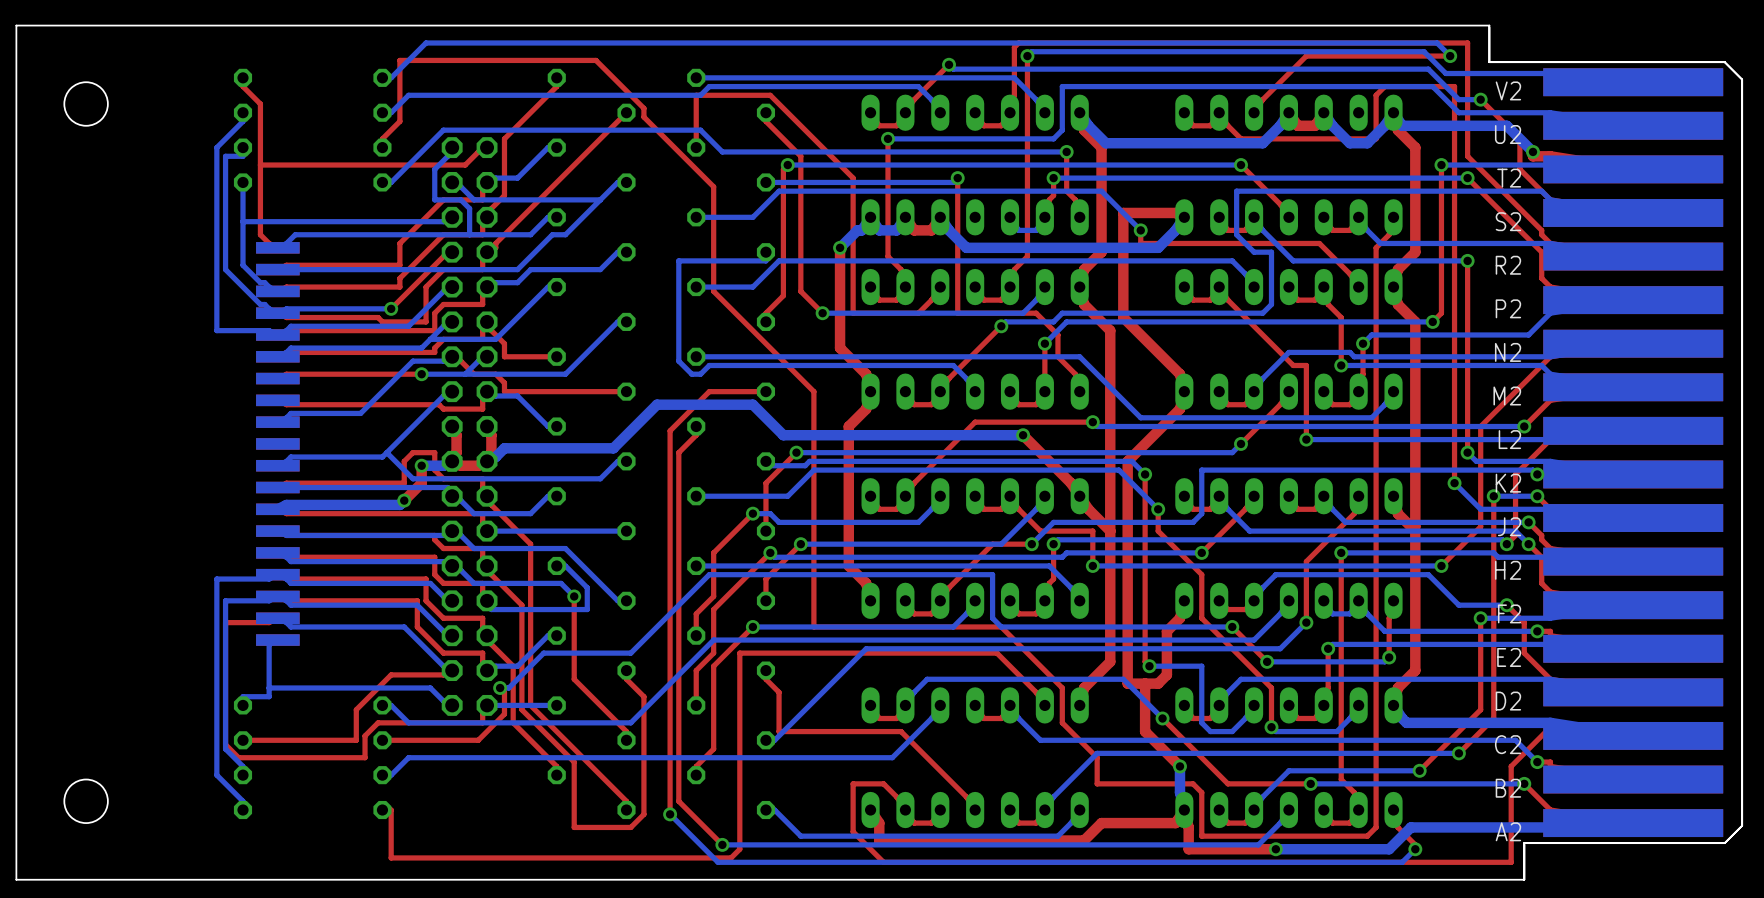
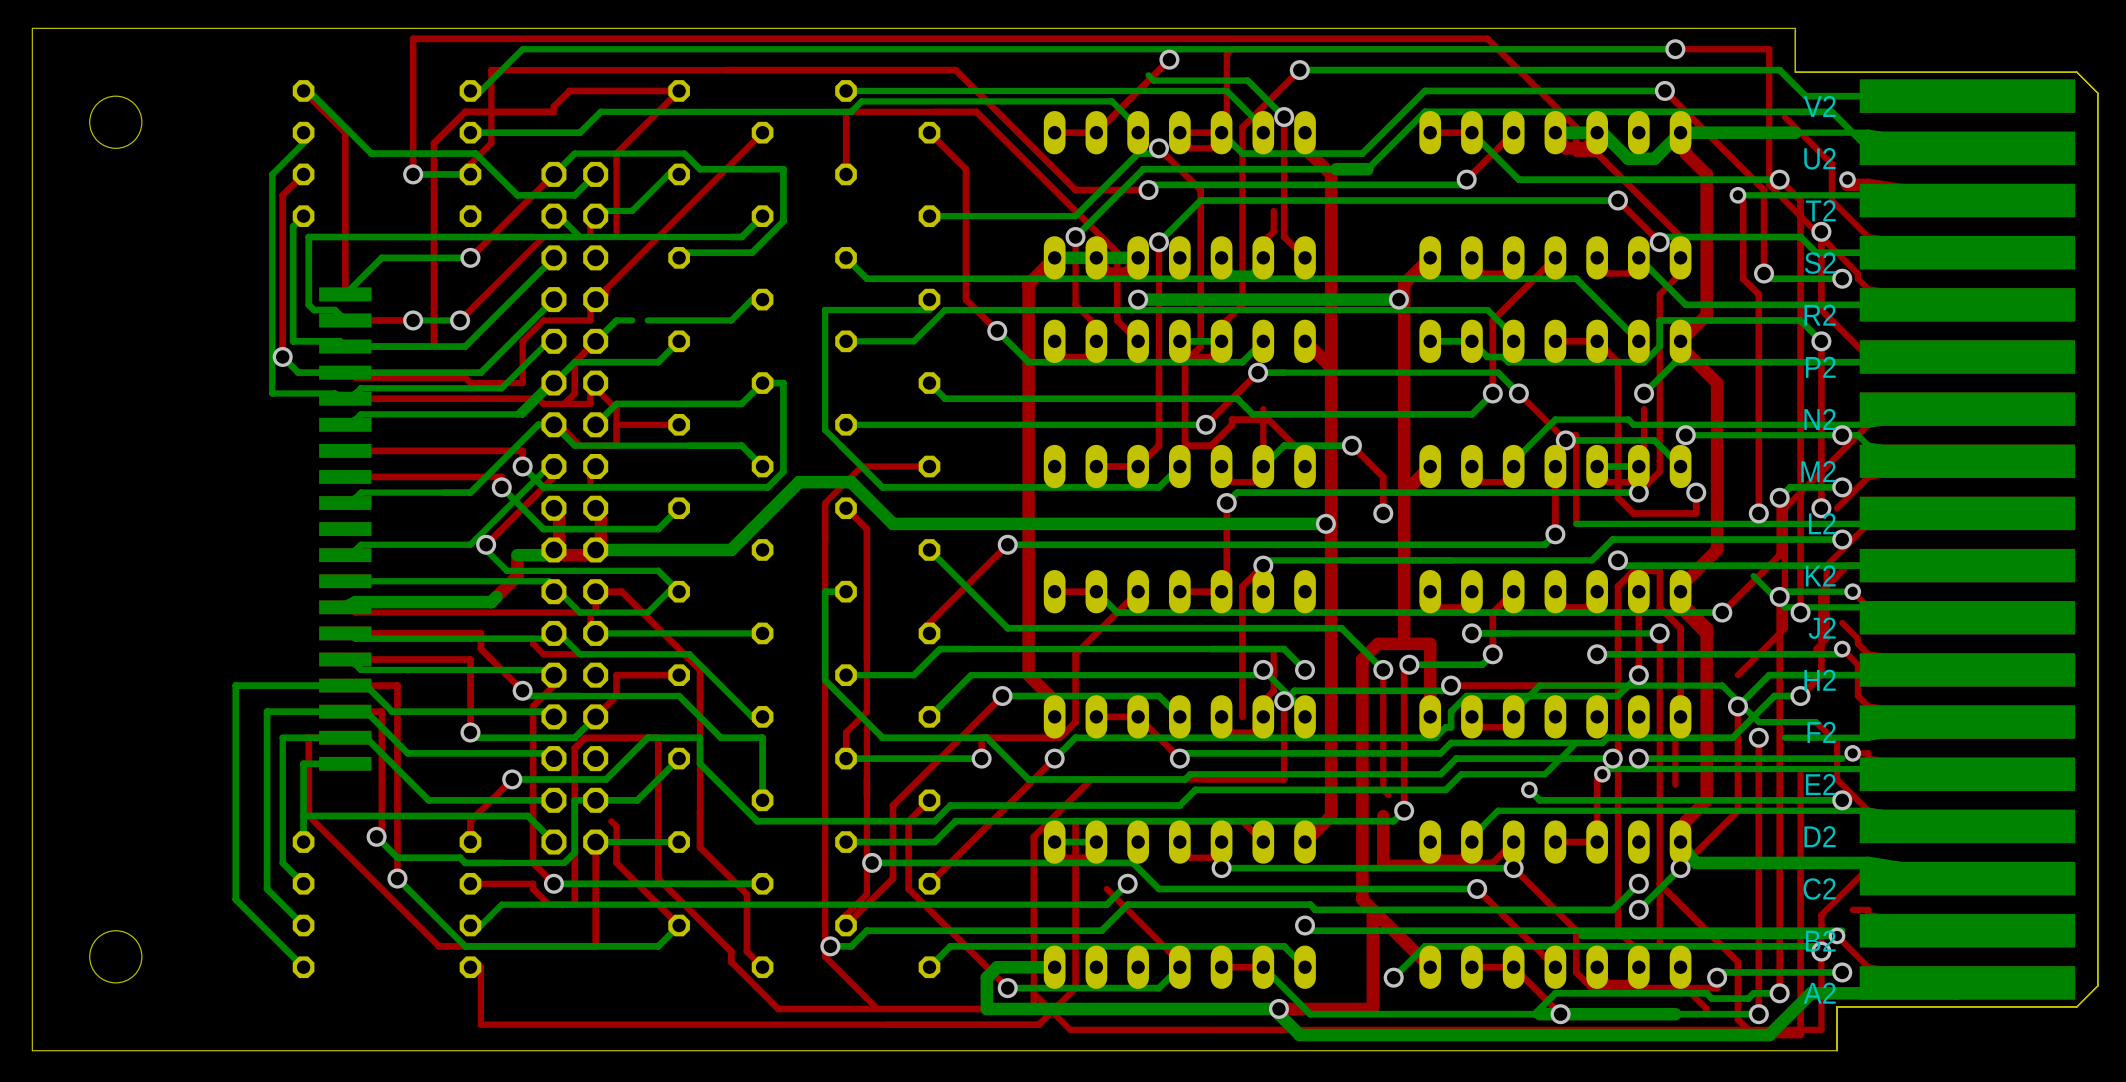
bottom track: (1389, 42) (1437, 42) (1450, 56) -> none
via: none -> (1675, 49)
via: none -> (1169, 59)
top track: (1027, 56) (1027, 108) -> (1299, 70) (1242, 127)
bottom track: (1027, 56) (1031, 51) (1424, 51) (1445, 73) (1550, 73) (1633, 82) -> (1299, 70) (1779, 70) (1805, 96) (1967, 96)
via: (1027, 56) -> none
top track: (1450, 56) (1306, 56) (1262, 99) (1254, 112) -> (1466, 179) (1513, 132)
via: (1450, 56) -> none
top track: (596, 60) (643, 108) (643, 117) (713, 186) (713, 291) (813, 391) (813, 626) (1001, 626) (1062, 687) (1062, 722) (1097, 757) (1097, 783) (1193, 783) (1201, 792) (1201, 836) (1367, 836) (1376, 827) (1376, 792) -> (726, 70) (955, 70) (1075, 190) (1148, 190)
via: none -> (1299, 70)
top track: (949, 64) (914, 99) (896, 125) (879, 125) (870, 112) -> (1169, 59) (1096, 132) (1054, 132)
via: (949, 64) -> none
bottom track: (1031, 69) (1428, 69) (1458, 99) (1480, 99) -> (1247, 80) (1284, 117)
top track: (243, 77) (243, 86) (260, 104) (260, 234) (269, 243) (277, 247) -> (303, 90) (345, 132) (345, 294)
bottom track: none -> (303, 90) (308, 90) (371, 153) (475, 153) (517, 195) (574, 195) (595, 174)
top track: (556, 77) (556, 86) (504, 138) -> none
top track: none -> (1664, 90) (1764, 190) (1764, 273)
bottom track: none -> (1664, 90) (1424, 90) (1362, 153) (1242, 153) (1221, 132)
via: none -> (1664, 90)
bottom track: (491, 95) (408, 95) (391, 112) -> (600, 111) (580, 132) (480, 132)
top track: (770, 95) (853, 178) (853, 313) (918, 313) (931, 300) (940, 287) -> (934, 111) (976, 111) (1117, 252) (1117, 320) (1138, 341)
via: none -> (1284, 117)
via: (1480, 99) -> none
top track: (765, 112) (765, 121) (800, 156) (800, 291) (822, 313) -> (929, 132) (965, 169) (965, 299) (997, 330)
top track: none -> (1221, 132) (1179, 132)
bottom track: (1079, 112) (1088, 125) (1105, 143) -> (1075, 237) (1143, 169) (1336, 169)
top track: (1184, 112) (1193, 125) (1210, 125) (1219, 112) (1227, 125) (1241, 138) (1376, 138) (1376, 95) (1384, 86) (1454, 86) (1454, 483) -> (1430, 132) (1471, 132)
bottom track: none -> (1471, 132) (1518, 179) (1779, 179)
bottom track: (1288, 112) (1280, 125) (1262, 143) (1132, 143) -> (1555, 132) (1602, 132) (1628, 158) (1654, 158) (1680, 132) (1758, 132)
bottom track: (1323, 112) (1332, 125) (1349, 143) (1367, 143) (1384, 125) (1393, 112) (1402, 125) (1506, 125) (1532, 151) -> none
bottom track: (1458, 112) (1432, 86) (1062, 86) (1062, 130) (1053, 138) (887, 138) -> none
bottom track width: thin (1489, 112) (1458, 112) -> thick (1795, 132) (1758, 132)
via: none -> (1158, 148)
bottom track: none -> (1967, 148) (1868, 148) (1831, 111) (1424, 111) (1367, 169)
bottom track: (469, 130) (443, 130) (391, 182) (382, 182) -> (574, 153) (553, 174)
bottom track: (561, 130) (700, 130) (722, 151) (1066, 151) -> (684, 153) (699, 169) (783, 169) (783, 221) (752, 252) (684, 252) (679, 257)
top track: (887, 138) (887, 199) -> none
via: (887, 138) -> none
top track: none -> (303, 174) (282, 195) (282, 356)
bottom track: (243, 147) (243, 156) (225, 156) (225, 269) (260, 304) (264, 304) (277, 313) (286, 308) (391, 308) -> none
top track: none -> (413, 174) (413, 38) (1487, 38) (1576, 127) (1576, 153) (1597, 153) (1680, 237) (1680, 257)
via: none -> (413, 174)
top track: none -> (553, 174) (470, 257)
bottom track: (452, 147) (447, 156) (434, 169) (434, 199) -> none
top track: (487, 147) (478, 151) (465, 165) (260, 165) -> none
top track: (1066, 151) (1066, 191) (1075, 199) (1079, 217) -> (1284, 117) (1284, 237) (1305, 257)
via: (1066, 151) -> none
bottom track: none -> (1466, 179) (1461, 184) (1153, 184) (1148, 190)
via: none -> (1466, 179)
top track: none -> (1779, 179) (1800, 200) (1800, 591)
via: none -> (1779, 179)
via: none -> (1148, 190)
top track: (787, 165) (783, 169) (783, 295) (765, 313) (765, 321) -> none
via: (787, 165) -> none
top track: (1241, 165) (1280, 204) (1288, 217) -> (1492, 393) (1492, 320) (1555, 257)
bottom track: (1241, 165) (787, 165) -> none
via: (1241, 165) -> none
top track: (1441, 165) (1441, 313) (1432, 321) -> none
top track: none -> (1617, 200) (1659, 242)
bottom track: none -> (1617, 200) (1200, 200) (1158, 242)
via: none -> (1617, 200)
top track: none -> (1743, 200) (1743, 278) (1758, 294) (1758, 513)
top track: (957, 178) (957, 204) -> none
bottom track: (957, 178) (953, 182) (887, 182) -> (1158, 148) (1153, 153) (1138, 153) (1075, 216)
via: (957, 178) -> none
via: (1053, 178) -> none
top track: (1467, 178) (1541, 252) (1541, 278) (1550, 287) (1633, 300) -> (1821, 231) (1821, 310) (1868, 356) (1967, 356)
bottom track: (1467, 178) (1053, 178) -> none
via: (1467, 178) -> none
bottom track: (243, 182) (243, 265) (260, 282) (264, 282) (277, 291) -> none
bottom track: (626, 182) (617, 182) (565, 234) (552, 234) (517, 269) -> (762, 216) (741, 237) (731, 237)
top track: (504, 195) (491, 208) (482, 226) (482, 234) (443, 234) (399, 278) (399, 287) (286, 287) (277, 291) -> (616, 163) (616, 153) (679, 90) (569, 90) (553, 106) (553, 111) (465, 111) (433, 143) (433, 346) (345, 346)
via: none -> (1821, 231)
bottom track: (460, 199) (469, 208) (469, 234) -> (564, 237) (580, 237)
via: none -> (1075, 237)
via: none -> (1158, 242)
via: none -> (1659, 242)
bottom track: (1633, 212) (1550, 199) (1541, 191) (1236, 191) (1236, 234) (1254, 252) (1271, 252) (1271, 304) (1262, 313) (1241, 313) -> (1967, 252) (1816, 252) (1800, 237) (1664, 237) (1659, 242)
via: none -> (470, 257)
bottom track: (452, 217) (443, 221) (243, 221) -> (553, 257) (465, 346) (345, 346) (340, 341) (293, 341) (293, 226) (303, 216)
bottom track: (556, 217) (548, 217) (530, 234) (295, 234) (286, 243) (277, 247) -> (470, 257) (381, 257) (345, 294)
bottom track: (696, 217) (752, 217) (779, 191) (1101, 191) (1140, 230) -> (846, 257) (866, 278) (1576, 278) (1638, 341)
bottom track: (905, 217) (896, 230) (879, 230) (870, 217) (861, 230) (857, 230) (840, 247) -> none
top track: (1184, 217) (1175, 212) (1123, 212) (1123, 317) (1179, 374) (1184, 391) (1179, 409) (1127, 461) (1127, 552) -> (1430, 257) (1404, 283) (1404, 487) (1406, 489)
bottom track: (1184, 217) (1175, 230) (1158, 247) (966, 247) (949, 230) (940, 217) -> (1054, 257) (1138, 257)
bottom track: (1254, 217) (1262, 230) (1293, 260) (1467, 260) -> none
bottom track: (1358, 217) (1367, 230) (1380, 243) (1550, 243) (1633, 256) -> (1638, 257) (1685, 304) (1967, 304)
top track: (1140, 230) (1140, 243) (1319, 243) (1349, 273) (1358, 287) -> none
via: (1140, 230) -> none
bottom track: none -> (1764, 273) (1769, 278) (1842, 278)
via: none -> (1764, 273)
via: none -> (1842, 278)
top track: (399, 243) (399, 265) (286, 265) (277, 269) -> (413, 320) (345, 320)
top track: none -> (491, 289) (460, 320)
top track: (840, 247) (840, 348) (866, 374) (870, 391) (866, 409) (848, 426) -> (1054, 257) (1028, 283) (1028, 508)
via: (840, 247) -> none
top track: (452, 252) (443, 256) (391, 308) -> none
bottom track: none -> (553, 299) (480, 372) (298, 372) (282, 356)
via: none -> (1138, 299)
top track: (1101, 252) (1084, 269) (1079, 287) (1084, 304) (1110, 330) (1110, 661) (1084, 687) (1079, 705) -> (1305, 341) (1331, 367) (1331, 815) (1305, 842)
top track: none -> (1331, 299) (1331, 362) (1328, 364)
bottom track: none -> (1398, 299) (1138, 299)
via: none -> (1398, 299)
top track: (1415, 252) (1397, 269) (1393, 287) (1397, 304) (1415, 321) (1415, 526) (1413, 528) -> (1706, 299) (1706, 315) (1680, 341) (1680, 346) (1717, 383) (1717, 549) (1680, 586) (1680, 602) (1706, 628) (1706, 633)
top track: (1467, 260) (1467, 452) -> none
via: (1467, 260) -> none
bottom track: (334, 269) (277, 269) -> (533, 237) (308, 237) (308, 304) (314, 310) (334, 310) (345, 320)
via: none -> (413, 320)
via: none -> (460, 320)
bottom track: (504, 269) (373, 269) -> none
bottom track: (530, 269) (517, 282) (495, 282) (487, 287) -> (616, 320) (595, 341)
via: none -> (997, 330)
top track: (487, 287) (482, 295) (482, 304) (443, 304) (434, 313) (434, 330) (286, 330) (277, 334) -> (595, 341) (574, 362) (574, 393) (564, 403)
bottom track: (556, 287) (548, 287) (495, 339) (430, 339) -> (679, 341) (658, 362) (574, 362) (522, 414) (517, 414)
bottom track: none -> (1221, 341) (1179, 341)
bottom track: (1044, 287) (1036, 300) (1023, 313) (822, 313) -> (1263, 341) (1242, 362) (1028, 362) (997, 330)
top track: (1184, 287) (1193, 300) (1210, 300) (1219, 287) (1227, 300) (1258, 330) -> none
top track: (1288, 287) (1297, 300) (1315, 300) (1323, 287) (1328, 304) (1341, 317) -> (1555, 341) (1597, 341) (1617, 362) (1617, 377)
top track: none -> (1821, 341) (1821, 508)
bottom track: none -> (1821, 341) (1800, 320) (1659, 320) (1659, 346) (1644, 362) (1508, 362) (1503, 356) (1487, 356) (1471, 341) (1430, 341)
via: none -> (1821, 341)
via: none -> (282, 356)
bottom track: (1633, 300) (1550, 313) (1528, 334) (1371, 334) (1363, 343) -> (1967, 356) (1962, 362) (1675, 362) (1644, 393)
via: (391, 308) -> none
via: (822, 313) -> none
top track: (957, 313) (1036, 313) (1057, 334) (1057, 356) (1075, 374) (1079, 391) -> (1158, 148) (1200, 190) (1200, 346) (1185, 362) (1185, 445) (1211, 445) (1232, 424) (1232, 419) (1268, 419) (1299, 450) (1299, 461) (1305, 466)
top track: none -> (1258, 372) (1205, 424)
via: none -> (1258, 372)
bottom track: (1062, 313) (1053, 321) (1005, 321) (1001, 326) -> (1284, 372) (1258, 372)
bottom track: none -> (1498, 372) (1518, 393)
bottom track: (626, 321) (617, 321) (565, 374) -> (762, 466) (741, 445) (689, 445)
bottom track: none -> (929, 383) (945, 398) (1237, 398) (1252, 414) (1471, 414) (1492, 393)
bottom track: (1432, 321) (1066, 321) (1044, 343) -> none
via: (1432, 321) -> none
top track: (1001, 326) (949, 378) (931, 404) (914, 404) (905, 391) -> (1158, 372) (1158, 445) (1138, 466) (1096, 466)
via: (1001, 326) -> none
via: none -> (1492, 393)
via: none -> (1518, 393)
top track: (443, 339) (434, 348) (434, 352) (286, 352) (277, 356) -> (543, 403) (538, 398) (345, 398)
via: (1044, 343) -> none
via position: (1363, 343) -> (1644, 393)
bottom track: (452, 356) (443, 361) (412, 361) (360, 413) -> (574, 445) (553, 424) (538, 424) (470, 492) (444, 492)
bottom track: (487, 356) (478, 361) (465, 374) -> (595, 424) (616, 403) (741, 403) (762, 383) (783, 383) (783, 471) (767, 487) (543, 487) (522, 466)
bottom track: (996, 356) (1079, 356) (1140, 417) (1371, 417) (1384, 404) (1393, 391) -> (1565, 440) (1654, 440) (1680, 466)
via: none -> (1205, 424)
top track: none -> (1617, 435) (1617, 497) (1633, 513) (1696, 513) (1696, 492)
via: (1341, 365) -> none
bottom track: (1397, 365) (1341, 365) -> none
via: none -> (1685, 435)
via: none -> (1842, 435)
via: none -> (1565, 440)
top track: (421, 374) (286, 374) (277, 378) -> (522, 466) (522, 450) (345, 450)
via: (421, 374) -> none
bottom track: (469, 374) (421, 374) -> (470, 174) (413, 174)
top track: (495, 374) (504, 382) (504, 391) (626, 391) -> (606, 445) (616, 445) (616, 424)
bottom track: (691, 374) (700, 374) (709, 365) (953, 365) (966, 378) (975, 391) -> (840, 445) (882, 487) (1158, 487) (1179, 466)
top track: none -> (1351, 445) (1383, 476) (1383, 513)
bottom track: none -> (1351, 445) (1284, 445) (1263, 466)
via: none -> (1351, 445)
via: none -> (522, 466)
bottom track: (487, 391) (495, 396) (517, 396) (548, 426) (556, 426) -> (501, 487) (543, 529) (658, 529) (679, 508)
top track: none -> (1430, 466) (1404, 492) (1404, 643)
top track: (1288, 391) (1280, 404) (1241, 443) -> (1555, 466) (1555, 534)
bottom track: none -> (1638, 466) (1597, 466)
top track: (1376, 396) (1376, 478) -> (1659, 471) (1638, 492)
top track: (277, 400) (286, 404) (439, 404) (443, 409) (452, 409) -> (345, 476) (501, 476) (501, 487)
top track: none -> (553, 476) (486, 544)
bottom track: (700, 404) (752, 404) (783, 435) (1023, 435) -> (851, 482) (892, 523) (1325, 523)
via: none -> (501, 487)
bottom track: none -> (1842, 487) (1790, 487) (1779, 497)
via: none -> (1842, 487)
bottom track: none -> (1638, 492) (1237, 492) (1226, 503)
via: none -> (1638, 492)
via: none -> (1696, 492)
top track: none -> (1779, 497) (1779, 555) (1722, 612)
via: none -> (1779, 497)
top track: (678, 422) (670, 430) (670, 814) -> none
via: none -> (1226, 503)
top track: (1092, 422) (975, 422) (914, 483) (896, 509) (879, 509) (870, 496) -> (1096, 591) (1054, 591)
bottom track: (1092, 422) (1097, 426) (1524, 426) -> none
via: (1092, 422) -> none
top track: (696, 426) (696, 435) (678, 452) -> (825, 503) (825, 539)
via position: (1524, 426) -> (1821, 508)
via: none -> (1383, 513)
via: none -> (1758, 513)
top track: (1023, 435) (1071, 483) (1088, 509) (1110, 531) -> none
via: (1023, 435) -> none
via: none -> (1325, 523)
via: (1306, 439) -> none
bottom track: (1241, 443) (1232, 452) (796, 452) -> none
via: (1241, 443) -> none
bottom track: (613, 448) (504, 448) (495, 457) (487, 461) -> (746, 534) (731, 549) (595, 549)
bottom track: none -> (1555, 534) (1544, 544) (1007, 544)
via: none -> (1555, 534)
top track: (796, 452) (765, 483) (765, 522) -> (1007, 544) (929, 622)
via: (796, 452) -> none
bottom track: (1467, 452) (1476, 461) (1550, 461) (1633, 474) -> (1617, 560) (1623, 565) (1967, 565)
via: (1467, 452) -> none
via: none -> (1842, 539)
via: none -> (486, 544)
via: none -> (1007, 544)
bottom track: (626, 461) (617, 461) (600, 478) (539, 478) -> (679, 591) (658, 570)
via: (421, 465) -> none
bottom track: (770, 465) (805, 465) (809, 461) (1132, 461) (1145, 474) -> (934, 555) (1007, 628) (1341, 628) (1383, 669)
bottom track: (1049, 470) (813, 470) (787, 496) (696, 496) -> (1190, 774) (1185, 779) (1028, 779) (986, 737) (882, 737) (825, 680) (825, 591) (846, 591)
bottom track: (1118, 470) (1158, 509) -> (1351, 560) (1451, 560)
bottom track: (1201, 470) (1201, 513) (1193, 522) (1053, 522) (1031, 544) -> none
bottom track: (1319, 470) (1532, 470) (1537, 474) -> (1591, 560) (1612, 539) (1842, 539)
via: none -> (1617, 560)
top track: none -> (1263, 565) (1242, 586) (1242, 716)
via: none -> (1263, 565)
top track: (1145, 474) (1145, 561) -> none
via: (1145, 474) -> none
top track: none -> (1852, 565) (1847, 565) (1821, 591) (1821, 675) (1800, 696)
via: (1537, 474) -> none
top track: none -> (1659, 570) (1633, 570) (1617, 586) (1617, 659)
via: (1454, 483) -> none
top track: (277, 487) (286, 483) (404, 483) (404, 461) (412, 452) (434, 452) (434, 470) (443, 478) (482, 478) (482, 487) (491, 504) (530, 544) (530, 705) (626, 801) (626, 810) -> none
bottom track: none -> (1096, 591) (1117, 612) (1722, 612)
top track: none -> (1138, 591) (1075, 654) (1075, 722) (1059, 737) (981, 737) (981, 758)
bottom track: (940, 496) (931, 509) (918, 522) (779, 522) (770, 513) (752, 513) -> none
top track: (975, 496) (983, 509) (1001, 509) (1010, 496) (1018, 509) (1040, 531) (1092, 531) (1092, 565) -> (1179, 591) (1221, 591) (1226, 586) (1226, 503)
bottom track: (1044, 496) (1036, 509) (1001, 544) -> (1305, 669) (1284, 649) (1211, 649)
bottom track: (1219, 496) (1227, 509) (1249, 531) -> (1471, 633) (1508, 633)
top track: (1254, 496) (1245, 509) (1201, 552) -> (1513, 591) (1492, 612) (1492, 654)
bottom track: (1323, 496) (1332, 509) (1345, 522) (1528, 522) -> none
top track: (1358, 496) (1354, 513) (1306, 561) (1306, 622) -> (1638, 591) (1638, 675)
bottom track: none -> (1800, 591) (1784, 591) (1779, 596)
via: (1493, 496) -> none
via: (404, 500) -> none
top track: none -> (1779, 596) (1779, 993)
via: none -> (1779, 596)
top track: (1158, 509) (1158, 531) (1201, 574) (1201, 618) (1271, 687) (1271, 727) -> none
via: (1158, 509) -> none
top track: (1376, 509) (1376, 531) -> (1659, 607) (1680, 628) (1680, 716)
top track: none -> (590, 612) (595, 612) (595, 591) (621, 591) (699, 669) (699, 711)
top track: (752, 513) (713, 552) -> (846, 508) (866, 529) (866, 659)
via: (752, 513) -> none
via: none -> (1722, 612)
top track: (1493, 513) (1493, 648) -> none
via: none -> (1800, 612)
via: (1528, 522) -> none
top track: none -> (345, 633) (480, 633) (480, 649) (522, 690)
via: none -> (1471, 633)
bottom track: (1376, 531) (1515, 531) (1528, 544) -> none
via: none -> (1659, 633)
top track: (800, 544) (765, 579) (765, 600) -> none
via: (800, 544) -> none
top track: (1031, 544) (992, 544) (949, 587) (931, 613) (914, 613) (905, 600) -> (1179, 758) (1138, 716) (1096, 716)
via: (1031, 544) -> none
via: (1053, 544) -> none
bottom track: (1506, 544) (1502, 539) (1057, 539) (1053, 544) -> none
via: (1506, 544) -> none
top track: (482, 548) (482, 557) (491, 574) (521, 605) (521, 709) (574, 762) (574, 827) (630, 827) (643, 814) (643, 696) (626, 679) (626, 670) -> none
bottom track: none -> (1492, 654) (1482, 664) (1409, 664)
via: none -> (1492, 654)
via: none -> (1597, 654)
bottom track: none -> (1842, 654) (1597, 654)
top track: (277, 552) (286, 557) (434, 557) (434, 574) (443, 583) (482, 583) (482, 592) (487, 600) -> (345, 659) (470, 659) (470, 732)
top track: (770, 552) (713, 609) -> none
via: (770, 552) -> none
bottom track: (1201, 552) (1066, 552) (1062, 557) (774, 557) (770, 552) -> none
via: (1201, 552) -> none
bottom track: (1341, 552) (1493, 552) (1498, 557) (1550, 557) (1633, 561) -> (1737, 706) (1769, 675) (1962, 675) (1967, 669)
via: (1341, 552) -> none
top track: none -> (1409, 664) (1404, 669) (1404, 810)
via: none -> (1409, 664)
bottom track: (443, 561) (460, 570) (473, 583) -> (522, 690) (527, 696) (580, 696)
via: none -> (1263, 669)
via: none -> (1305, 669)
via: none -> (1383, 669)
top track: none -> (553, 675) (553, 685) (533, 706) (533, 862) (553, 883)
top track: none -> (679, 675) (616, 675) (616, 696) (595, 716)
bottom track: (556, 565) (565, 565) (587, 587) (587, 609) (491, 609) (487, 600) -> (470, 732) (475, 737) (574, 737) (595, 716)
bottom track: (800, 565) (752, 565) -> (971, 649) (939, 649) (913, 675)
bottom track: none -> (971, 675) (929, 716)
via: (1092, 565) -> none
bottom track: none -> (1638, 675) (1617, 696) (1466, 696) (1451, 711) (1451, 727) (1445, 727) (1435, 737) (1075, 737) (1054, 758)
via: none -> (1638, 675)
bottom track: (1441, 565) (1092, 565) -> none
via: (1441, 565) -> none
top track: (277, 574) (286, 579) (426, 579) (426, 600) (443, 618) (478, 618) -> (345, 685) (397, 685) (397, 878)
bottom track: none -> (1451, 685) (1445, 690) (1294, 690) (1284, 701)
via: none -> (1451, 685)
top track: none -> (1617, 685) (1451, 685)
via: none -> (522, 690)
bottom track: (556, 583) (561, 583) (574, 596) -> (679, 696) (720, 737) (762, 737) (762, 800)
top track: none -> (1002, 696) (892, 805) (892, 878) (846, 925)
via: none -> (1002, 696)
bottom track: none -> (1800, 696) (1774, 696) (1732, 737) (1607, 737) (1602, 742) (1451, 742) (1440, 753) (1185, 753) (1179, 758)
via: none -> (1800, 696)
via: none -> (1284, 701)
top track: none -> (1737, 706) (1737, 810) (1680, 868)
via: none -> (1737, 706)
top track: (277, 596) (286, 600) (417, 600) (417, 626) (443, 653) (482, 653) (482, 661) (487, 670) -> (345, 711) (381, 711) (381, 831) (376, 836)
via: (574, 596) -> none
bottom track: (452, 600) (443, 596) (430, 583) (290, 583) (277, 574) (269, 579) (216, 579) (216, 775) (243, 801) (243, 810) -> (553, 716) (548, 711) (392, 711) (366, 685) (235, 685) (235, 899) (303, 967)
bottom track: (975, 600) (966, 613) (953, 626) (752, 626) -> (1179, 716) (1158, 696) (1002, 696)
top track: (1184, 600) (1179, 618) (1166, 631) (1166, 674) (1158, 683) (1127, 683) -> (1430, 716) (1430, 643) (1378, 643) (1362, 659)
bottom track: (1288, 600) (1280, 613) (1254, 640) (713, 640) (630, 722) (460, 722) -> none
bottom track: (1323, 600) (1332, 613) (1349, 613) (1358, 600) (1367, 613) (1384, 631) (1537, 631) -> none
via: (1506, 605) -> none
via: none -> (470, 732)
bottom track: (225, 618) (225, 600) (269, 600) (277, 596) (290, 605) (417, 605) (443, 631) (452, 635) -> (282, 737) (366, 737) (428, 800) (553, 800)
top track: (277, 618) (269, 622) (225, 622) (225, 744) (238, 757) (365, 757) (365, 735) (378, 722) (482, 722) (482, 714) (487, 705) -> (345, 737) (308, 737) (308, 815) (439, 946) (595, 946) (595, 842)
bottom track: (277, 618) (290, 626) (404, 626) (443, 666) (452, 670) -> none
top track: (482, 618) (482, 626) (491, 644) (513, 666) (513, 722) (556, 766) (556, 775) -> (616, 852) (616, 862) (679, 925)
top track: none -> (590, 737) (658, 737) (658, 878) (731, 951) (731, 962) (778, 1008) (1033, 1008) (1033, 993)
top track: none -> (1758, 737) (1758, 1014)
via: none -> (1758, 737)
top track: (1480, 618) (1480, 709) (1419, 770) -> none
via: (1480, 618) -> none
via: (1306, 622) -> none
top track: (752, 626) (713, 666) -> none
via: (752, 626) -> none
top track: (1232, 626) (1267, 661) -> none
bottom track: (1232, 626) (1001, 626) (992, 618) (992, 574) (709, 574) (630, 653) (543, 653) (508, 687) (500, 687) -> none
via: (1232, 626) -> none
bottom track: none -> (553, 758) (548, 753) (407, 753) (366, 711) (267, 711) (267, 888) (303, 925)
bottom track: (556, 635) (548, 635) (517, 666) (495, 666) (487, 670) -> (679, 758) (637, 800) (574, 800) (574, 852) (564, 862)
bottom track: none -> (981, 758) (846, 758)
via: none -> (981, 758)
top track: none -> (1054, 758) (929, 883)
via: none -> (1054, 758)
via: none -> (1179, 758)
via: none -> (1612, 758)
via: none -> (1638, 758)
bottom track: none -> (1842, 758) (1638, 758)
bottom track: (277, 640) (269, 644) (269, 696) (243, 696) -> (345, 763) (303, 763) (303, 831)
bottom track: (983, 648) (866, 648) (774, 740) (765, 740) -> none
bottom track: (1210, 648) (1193, 648) -> (1612, 758) (1456, 758) (1440, 774)
bottom track: none -> (1461, 774) (1445, 789) (1195, 789) (1179, 805) (950, 805) (934, 821) (757, 821) (699, 763) (699, 737) (647, 737) (606, 779) (512, 779)
top track: (1328, 648) (1328, 687) (1323, 705) (1315, 718) (1297, 718) (1288, 705) -> (1597, 779) (1597, 842) (1555, 842)
top track: none -> (512, 779) (470, 821) (470, 842)
via: none -> (512, 779)
top track: (713, 653) (696, 670) (696, 705) -> (866, 779) (866, 795)
top track: (901, 653) (739, 653) (739, 849) (731, 857) -> (1091, 779) (1033, 836) (1033, 935)
top track: (996, 653) (1036, 692) (1044, 705) -> (1205, 779) (1284, 779) (1284, 701)
bottom track: (1389, 657) (1384, 661) (1267, 661) -> none
via: (1389, 657) -> none
bottom track: (1149, 666) (1201, 666) (1201, 722) (1210, 731) (1232, 731) (1245, 718) (1254, 705) -> none
via: (1149, 666) -> none
bottom track: none -> (1534, 795) (1539, 800) (1842, 800)
top track: (452, 670) (443, 674) (391, 674) (356, 709) (356, 740) (243, 740) -> none
top track: (765, 670) (765, 679) (779, 692) (779, 731) (901, 731) (914, 744) -> (929, 800) (908, 821) (908, 888) (1007, 988)
via: none -> (1842, 800)
top track: (574, 679) (626, 731) (626, 740) -> (699, 810) (699, 847) (746, 894) (746, 951) (762, 967)
bottom track: none -> (1404, 810) (1393, 821) (955, 821) (934, 842) (846, 842)
via: none -> (1404, 810)
top track: none -> (1362, 815) (1362, 899) (1430, 967)
bottom track: (269, 687) (430, 687) (443, 701) (452, 705) -> (303, 815) (527, 815) (553, 842)
via: (500, 687) -> none
via: none -> (376, 836)
bottom track: (382, 705) (391, 705) (408, 722) -> (376, 836) (397, 857) (460, 857) (465, 862) (501, 862)
bottom track: (905, 705) (914, 692) (927, 679) (1123, 679) (1162, 718) -> (1096, 842) (1054, 842)
bottom track: (940, 705) (931, 718) (892, 757) -> (1127, 883) (1106, 904) (1080, 904)
bottom track: (1010, 705) (1018, 718) (1040, 740) (1515, 740) (1537, 762) -> none
top track: none -> (1263, 842) (1242, 821) (1075, 821) (1075, 988) (1039, 1024) (887, 1024)
bottom track: (1358, 705) (1349, 718) (1336, 731) (1275, 731) (1271, 727) -> none
top track: (504, 714) (478, 740) (434, 740) -> (585, 737) (574, 748) (574, 904) (548, 904) (533, 888) (533, 883)
top track: (1162, 718) (1227, 783) (1310, 783) -> none
via: (1162, 718) -> none
top track: (1493, 718) (1458, 753) -> (1800, 857) (1800, 1035) (1753, 1035) (1737, 1019) (1737, 962) (1659, 883)
bottom track: (225, 722) (225, 749) (243, 766) (243, 775) -> (282, 862) (303, 883)
bottom track: none -> (872, 862) (1132, 862) (1158, 888) (1477, 888)
via: none -> (872, 862)
top track: (1145, 722) (1145, 731) (1179, 766) -> (1383, 862) (1492, 862) (1513, 842)
via: none -> (1221, 868)
top track: none -> (1513, 868) (1576, 930) (1576, 972) (1591, 988) (1717, 988) (1717, 977)
bottom track: none -> (1513, 868) (1221, 868)
via: none -> (1513, 868)
via: (1271, 727) -> none
bottom track: none -> (1680, 868) (1638, 909)
via: none -> (1680, 868)
bottom track: none -> (397, 878) (465, 946) (658, 946) (679, 925)
via: none -> (397, 878)
via: none -> (553, 883)
bottom track: none -> (762, 883) (553, 883)
via: none -> (1127, 883)
bottom track: none -> (1638, 883) (1612, 909) (1315, 909) (1310, 904) (1127, 904) (1101, 930) (866, 930) (851, 946) (830, 946)
via: none -> (1638, 883)
top track: none -> (1477, 888) (1555, 967)
via: none -> (1477, 888)
bottom track: (1458, 753) (1097, 753) (1053, 796) (1044, 810) -> (1779, 993) (1753, 993) (1748, 998) (1711, 998) (1706, 993) (1555, 993) (1534, 1014) (1310, 1014) (1263, 967)
via: (1458, 753) -> none
via: none -> (1638, 909)
via: (1537, 762) -> none
top track: none -> (1375, 912) (1372, 915) (1372, 1008) (1278, 1008)
bottom track: (1179, 766) (1179, 792) (1184, 810) -> none
via: (1179, 766) -> none
bottom track: (1419, 770) (1288, 770) (1262, 796) (1254, 810) -> none
via: (1419, 770) -> none
bottom track: none -> (1305, 925) (1310, 930) (1842, 930)
via: none -> (1305, 925)
top track: (853, 783) (883, 783) (896, 796) (914, 823) (931, 823) (940, 810) -> none
via: (1310, 783) -> none
via: none -> (830, 946)
bottom track: none -> (1821, 951) (1816, 946) (1424, 946) (1393, 977)
via: none -> (1821, 951)
top track: (870, 810) (879, 823) (879, 840) (1084, 840) (1101, 823) (1175, 823) (1184, 810) (1188, 827) (1188, 849) (1275, 849) -> none
bottom track: none -> (1179, 967) (1158, 988) (1007, 988)
top track: (1044, 810) (1036, 823) (1018, 823) (1010, 810) -> (1263, 967) (1221, 967)
bottom track: (1079, 810) (1071, 823) (1057, 836) (800, 836) (774, 810) (765, 810) -> (1305, 967) (1284, 946) (950, 946) (929, 967)
top track: (1254, 810) (1245, 823) (1227, 823) (1219, 810) -> (1560, 1014) (1513, 967) (1471, 967)
bottom track: (1288, 810) (1280, 823) (1258, 844) (1057, 844) -> (1967, 982) (1957, 993) (1810, 993) (1769, 1035) (1299, 1035) (1278, 1014) (1278, 1008)
bottom track: (670, 814) (718, 862) (1402, 862) (1415, 849) -> none
via: (670, 814) -> none
bottom track: none -> (1842, 972) (1722, 972) (1717, 977)
via: none -> (1842, 972)
via: none -> (1393, 977)
via: none -> (1717, 977)
bottom track: (1633, 823) (1550, 827) (1410, 827) (1389, 849) -> (1758, 1014) (1675, 1014)
via: none -> (1007, 988)
via: none -> (1779, 993)
via: (722, 844) -> none
bottom track: (813, 844) (722, 844) -> (986, 1008) (986, 977) (997, 967) (1054, 967)
bottom track width: thin (1057, 844) (813, 844) -> thick (1278, 1008) (986, 1008)
via: none -> (1278, 1008)
via: (1275, 849) -> none
via: none -> (1560, 1014)
via: (1415, 849) -> none
via: none -> (1758, 1014)

